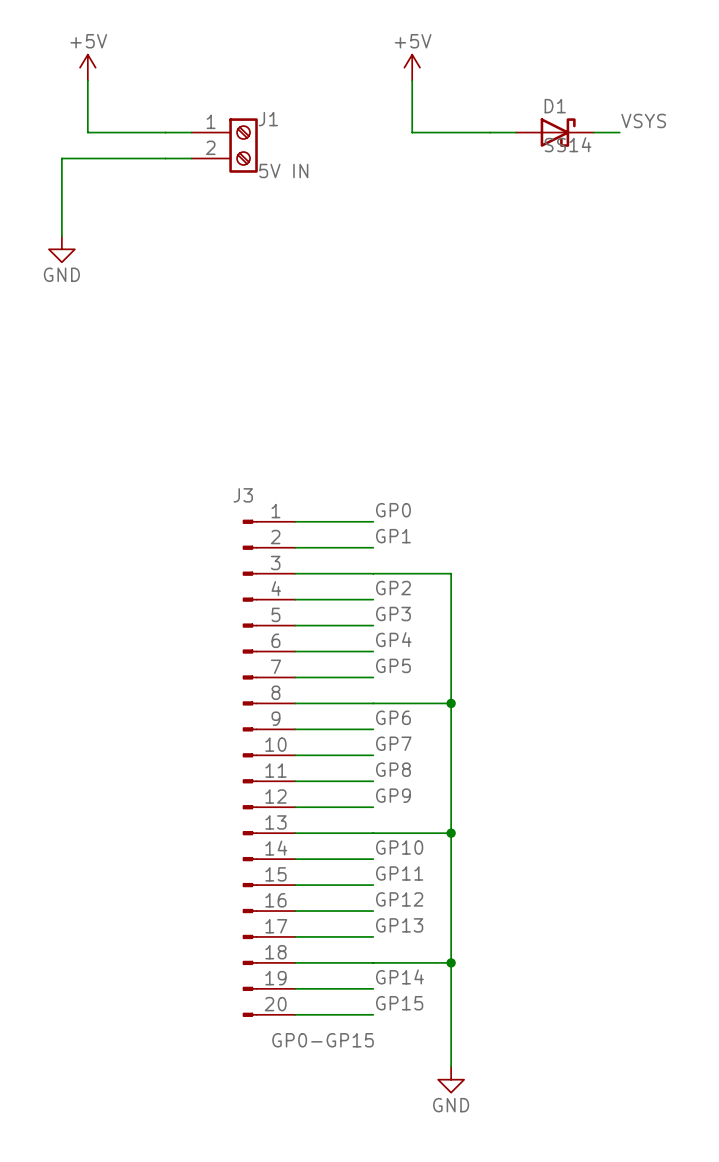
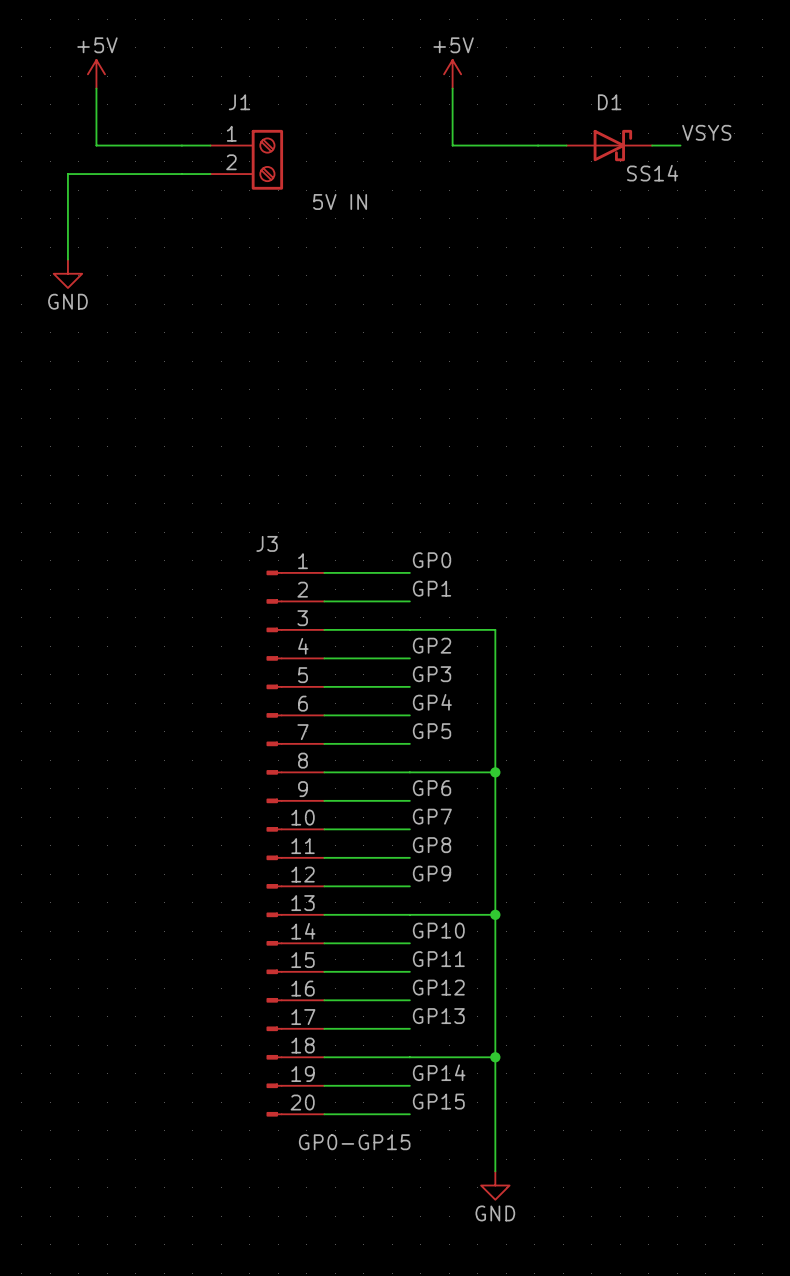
D1 name position: D1 (555, 106) -> D1 (609, 102)
J1 name position: J1 (268, 119) -> J1 (239, 102)
D1 value position: SS14 (567, 144) -> SS14 (652, 173)
J1 value position: 5V IN (283, 170) -> 5V IN (340, 202)

